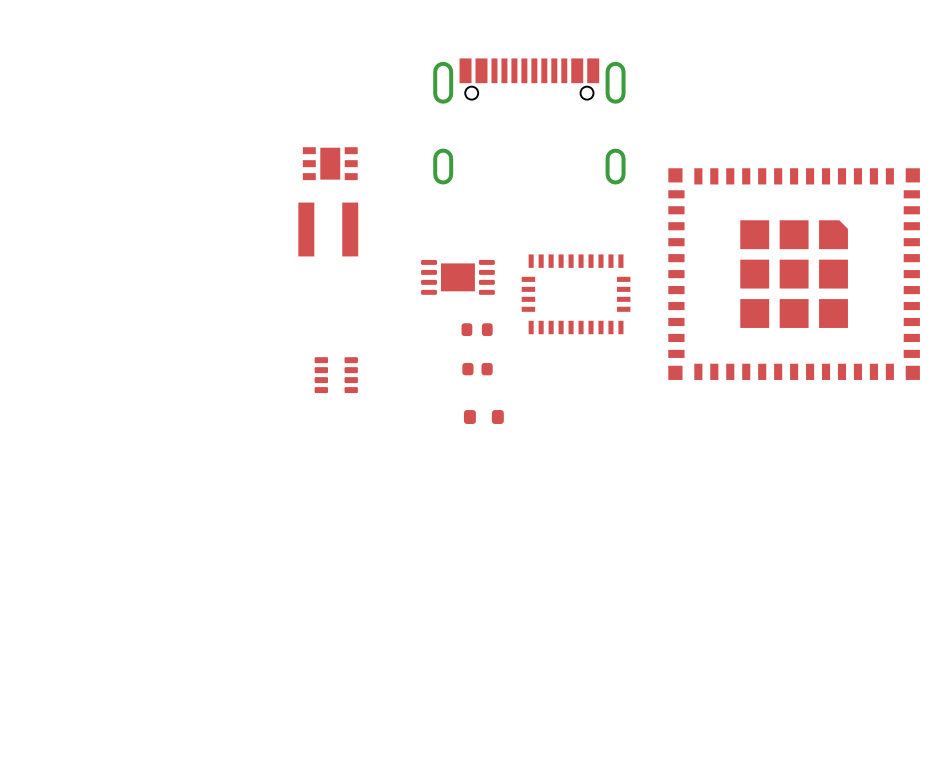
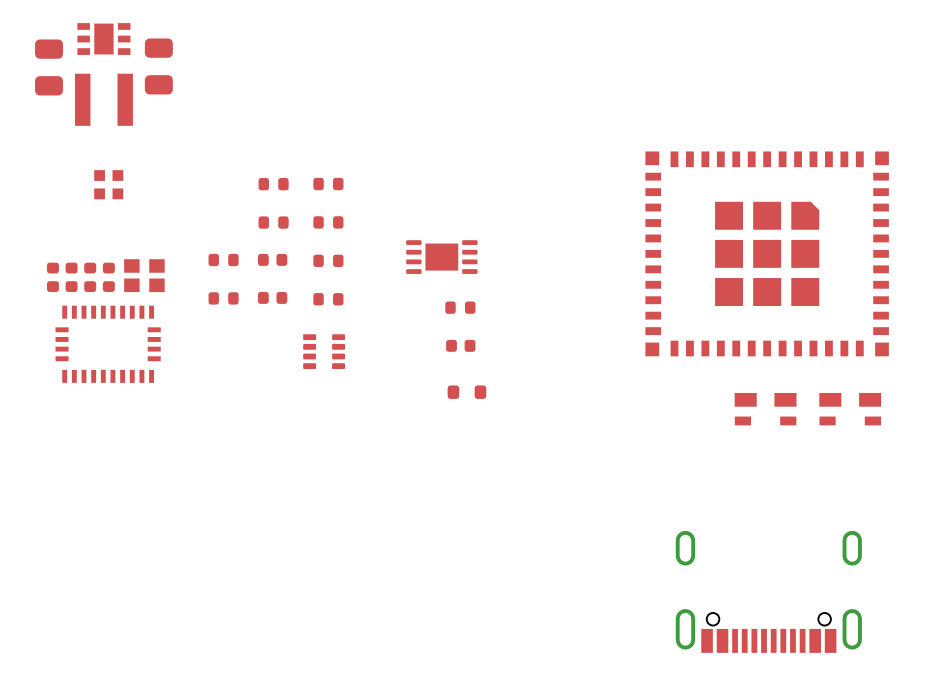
part: none -> (158, 66)
part: none -> (49, 67)
part: (529, 121) -> none
part position: (330, 163) -> (103, 39)
part: none -> (328, 184)
part: none -> (108, 184)
part: none -> (273, 184)
part position: (328, 229) -> (103, 99)
part: none -> (273, 222)
part: none -> (328, 222)
part: none -> (223, 260)
part: none -> (272, 259)
part: none -> (328, 260)
part position: (576, 294) -> (108, 344)
part: none -> (144, 275)
part: none -> (52, 277)
part: none -> (71, 277)
part: none -> (90, 277)
part: none -> (108, 277)
part: none -> (272, 297)
part: none -> (223, 298)
part: none -> (328, 299)
part: none -> (765, 409)
part: none -> (850, 409)
part: none -> (768, 591)

